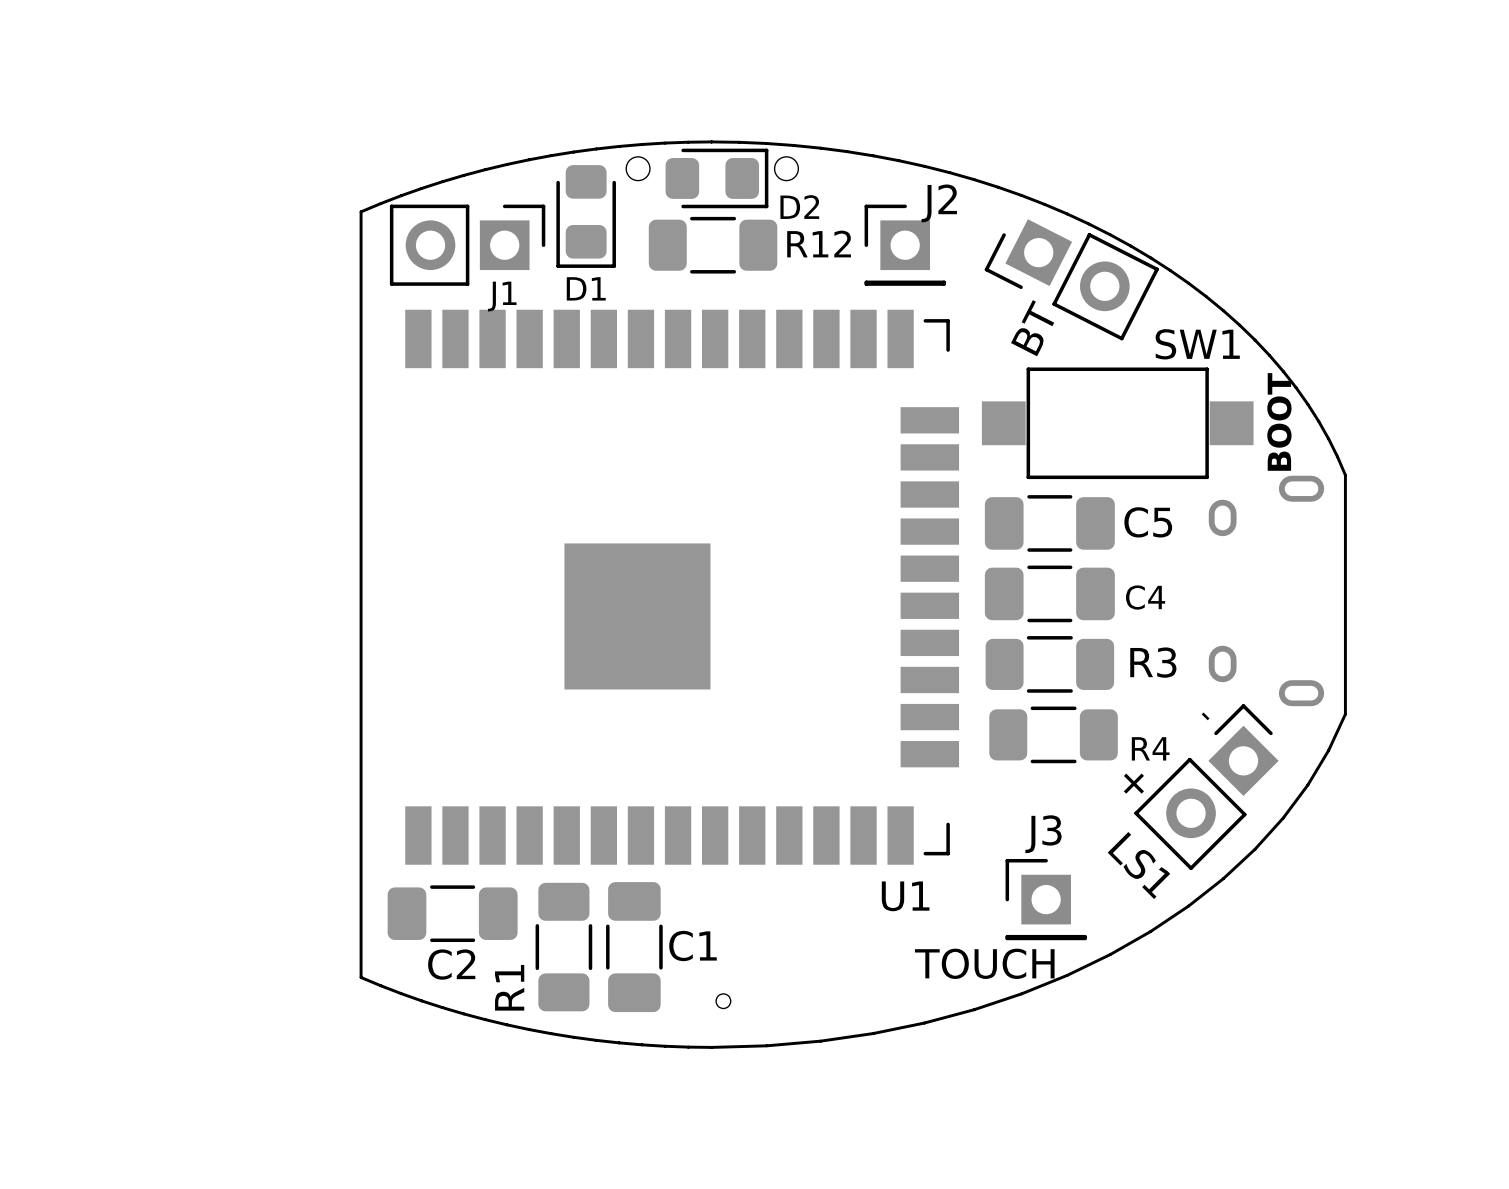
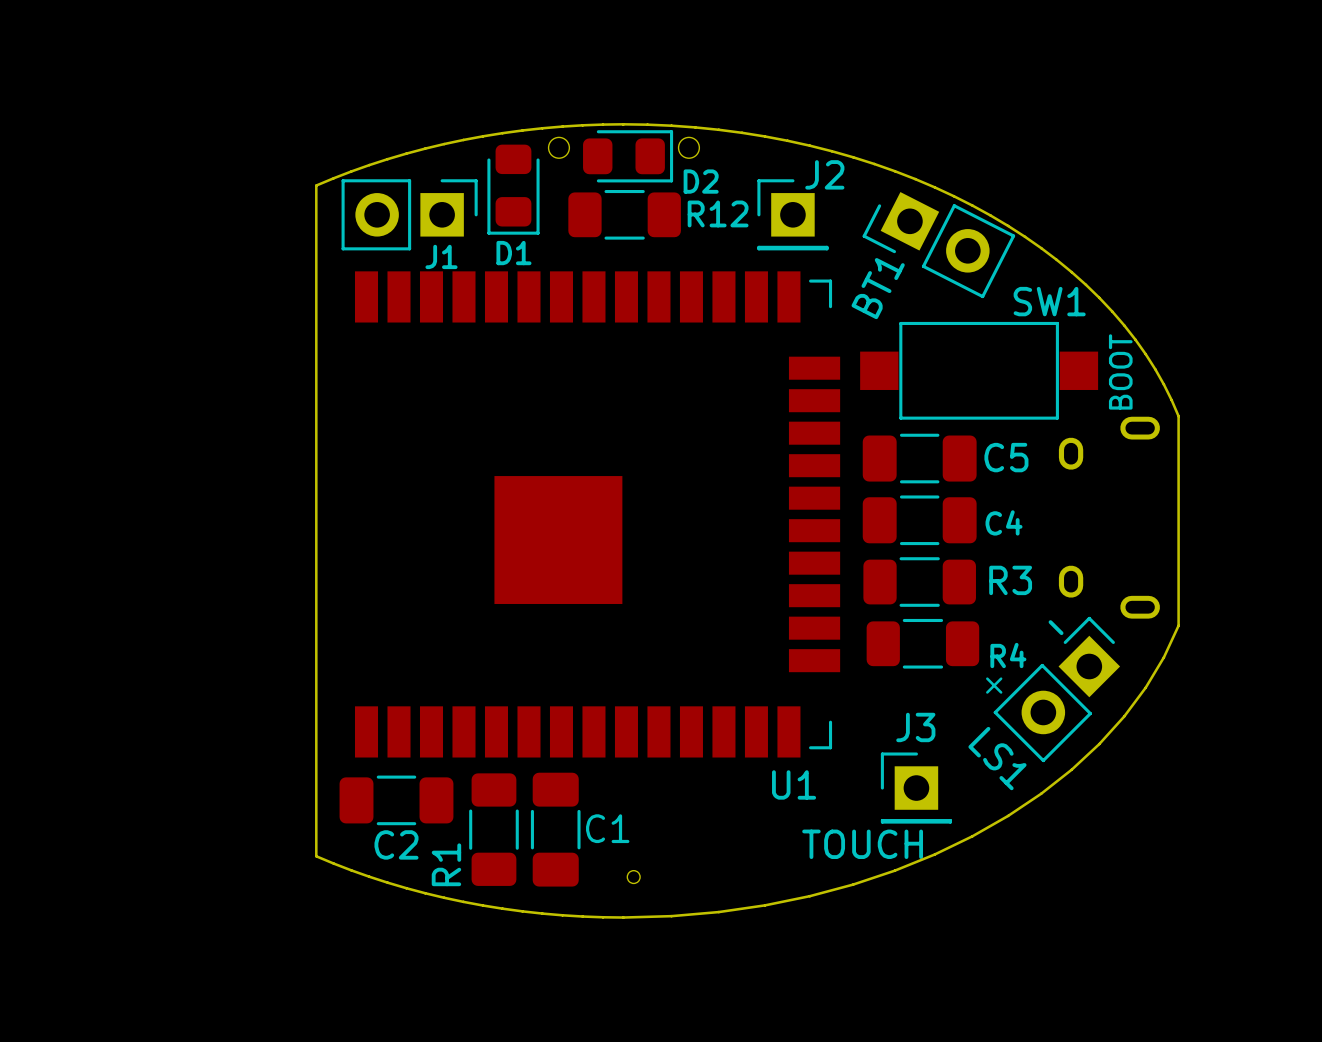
BT name: BT (1032, 328) -> BT1 (878, 288)

